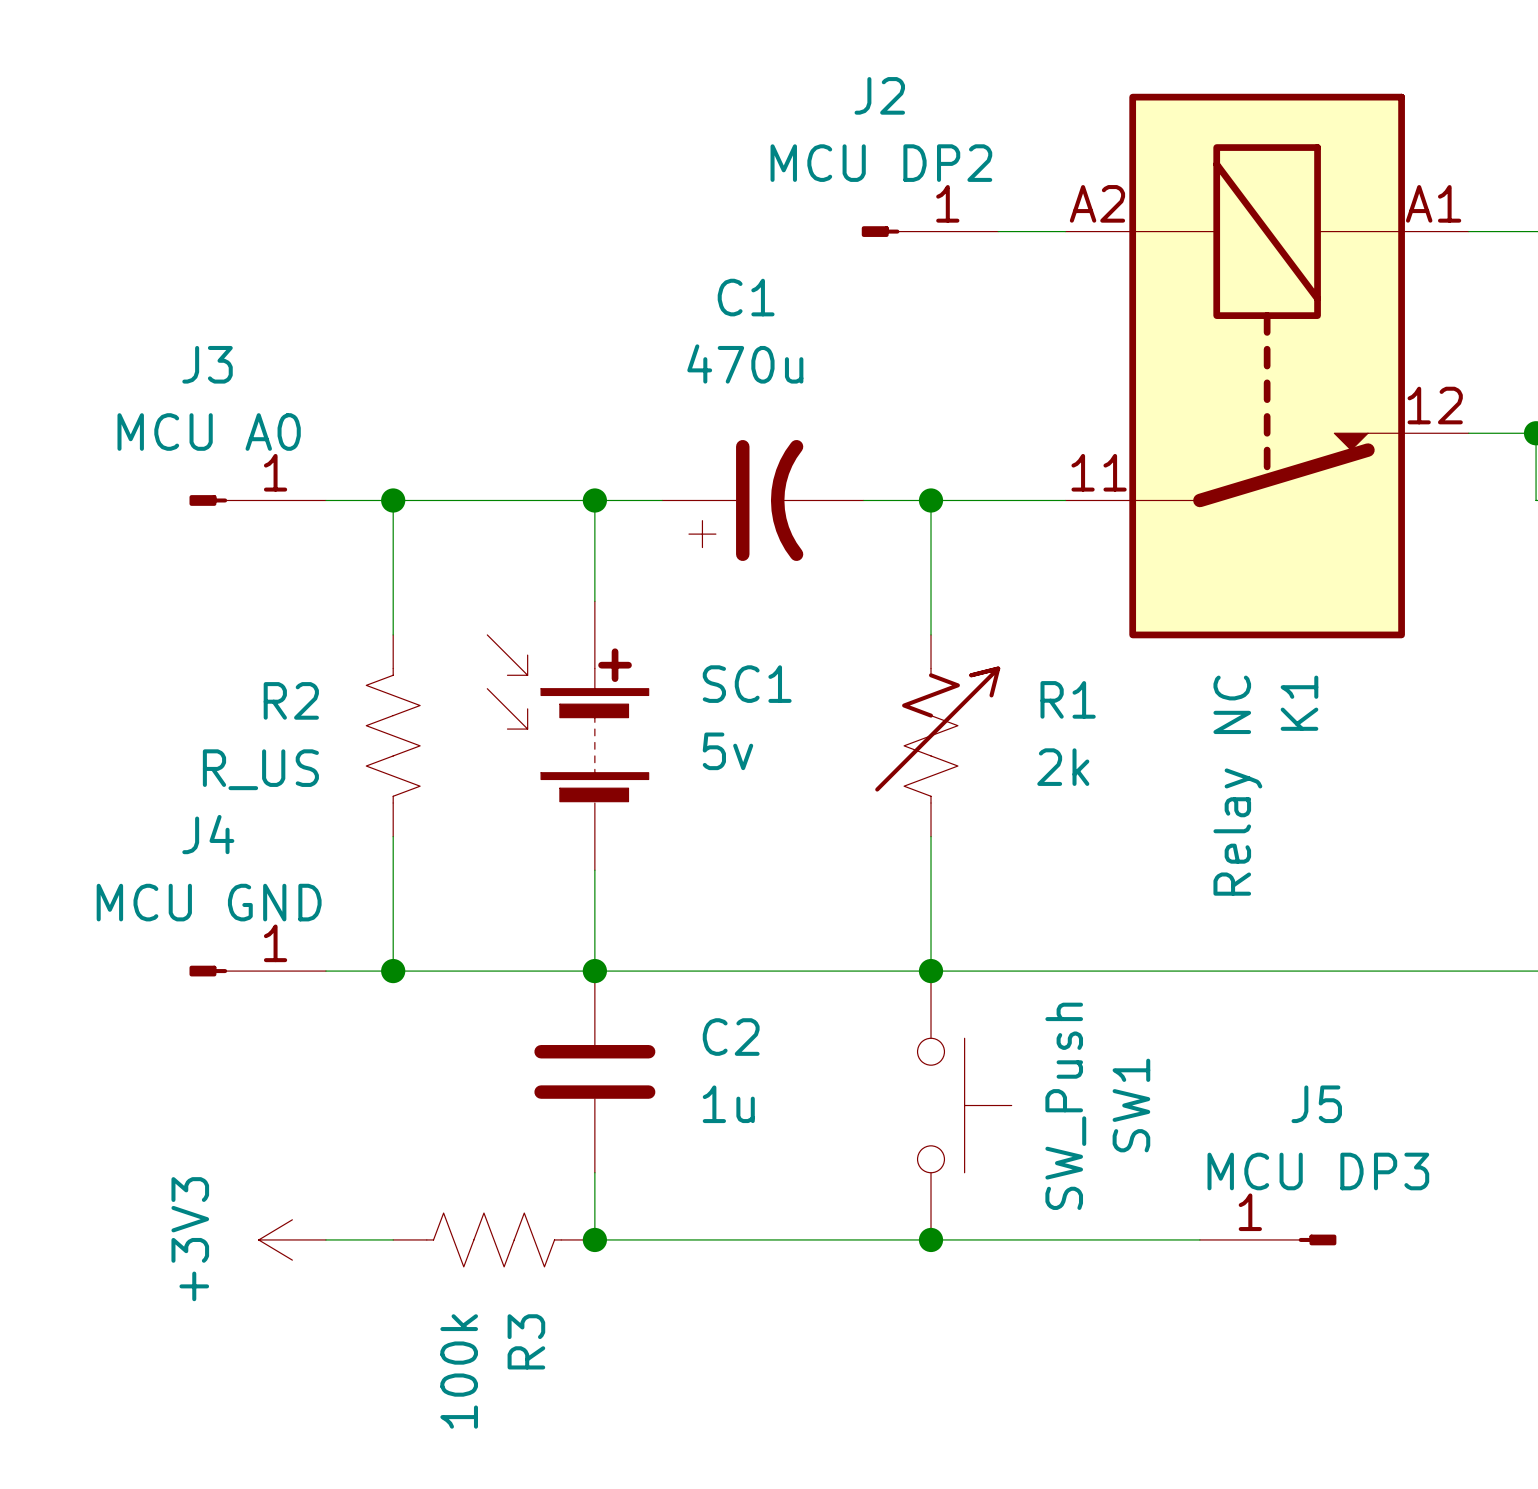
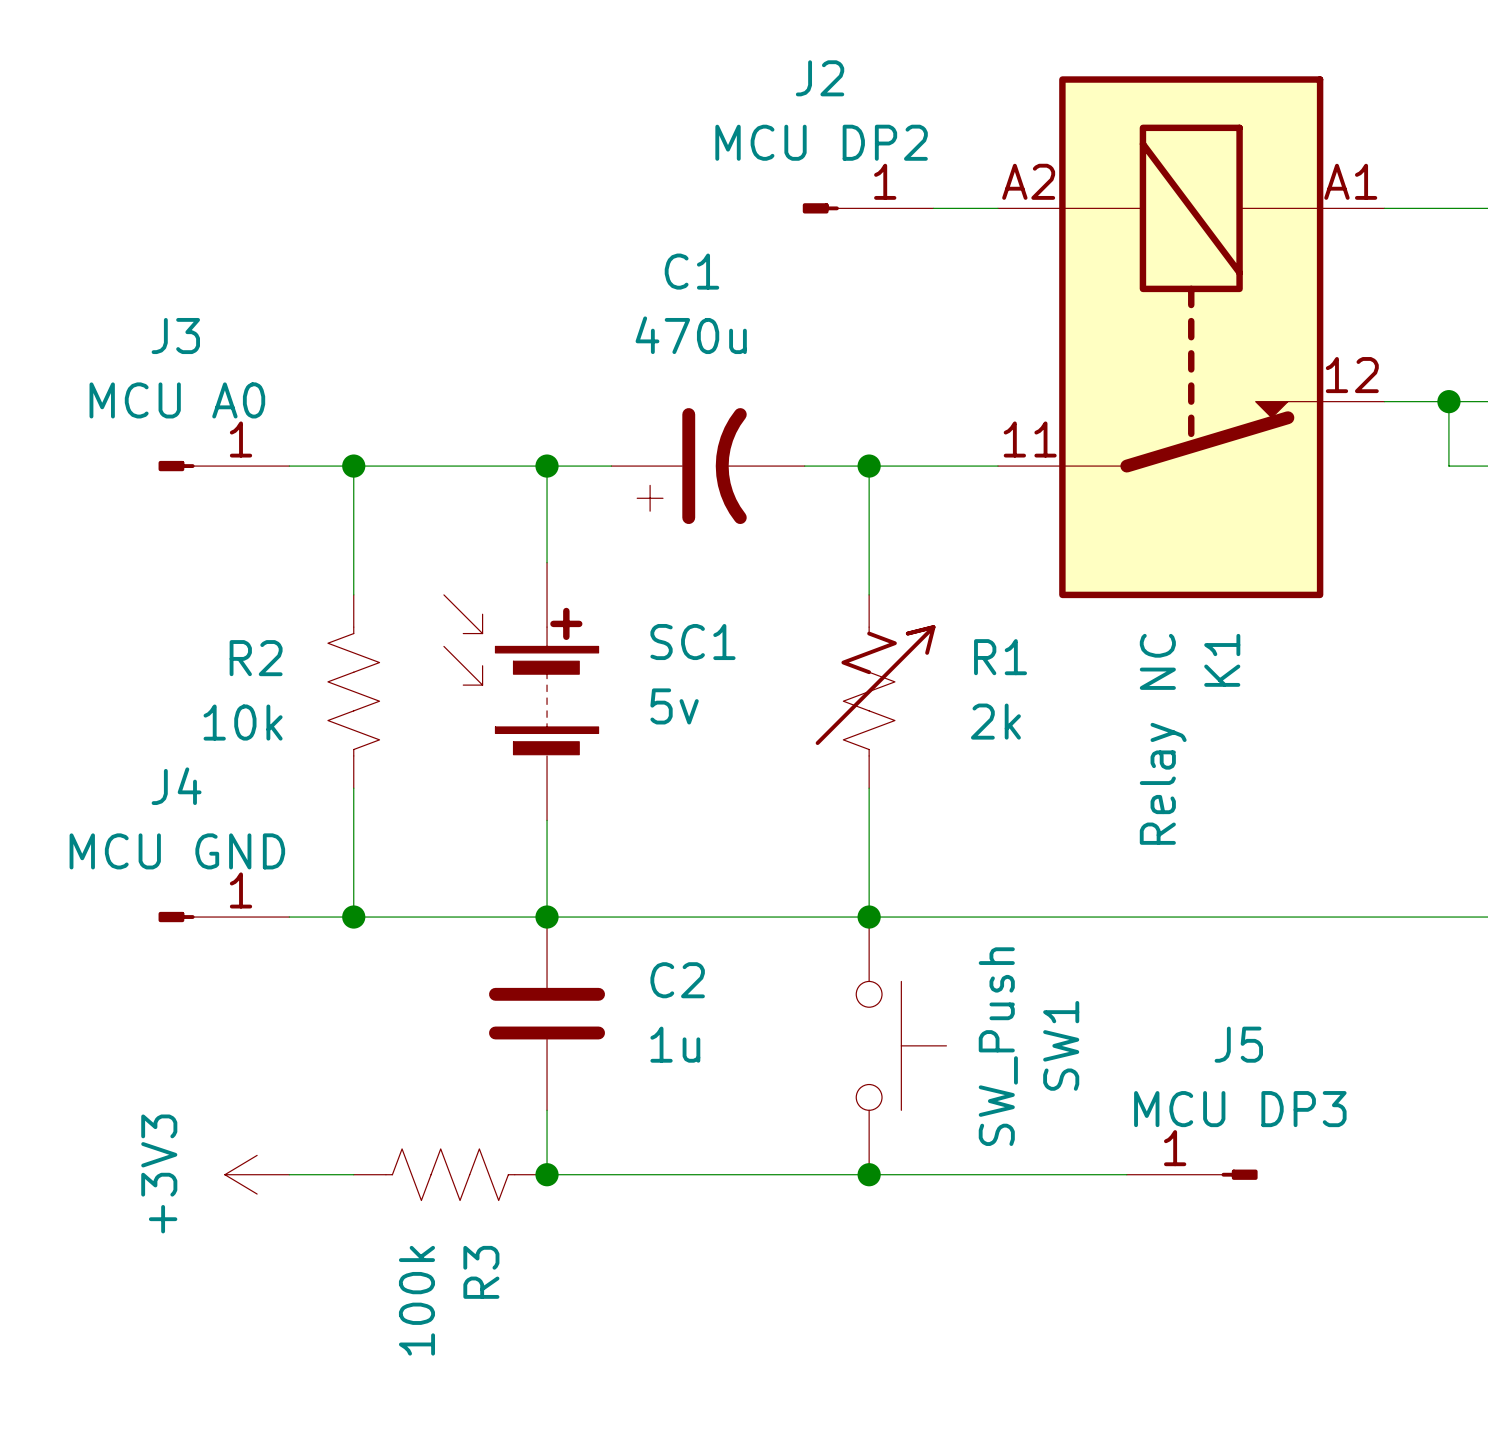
R2 value: R_US (260, 769) -> 10k (243, 722)

